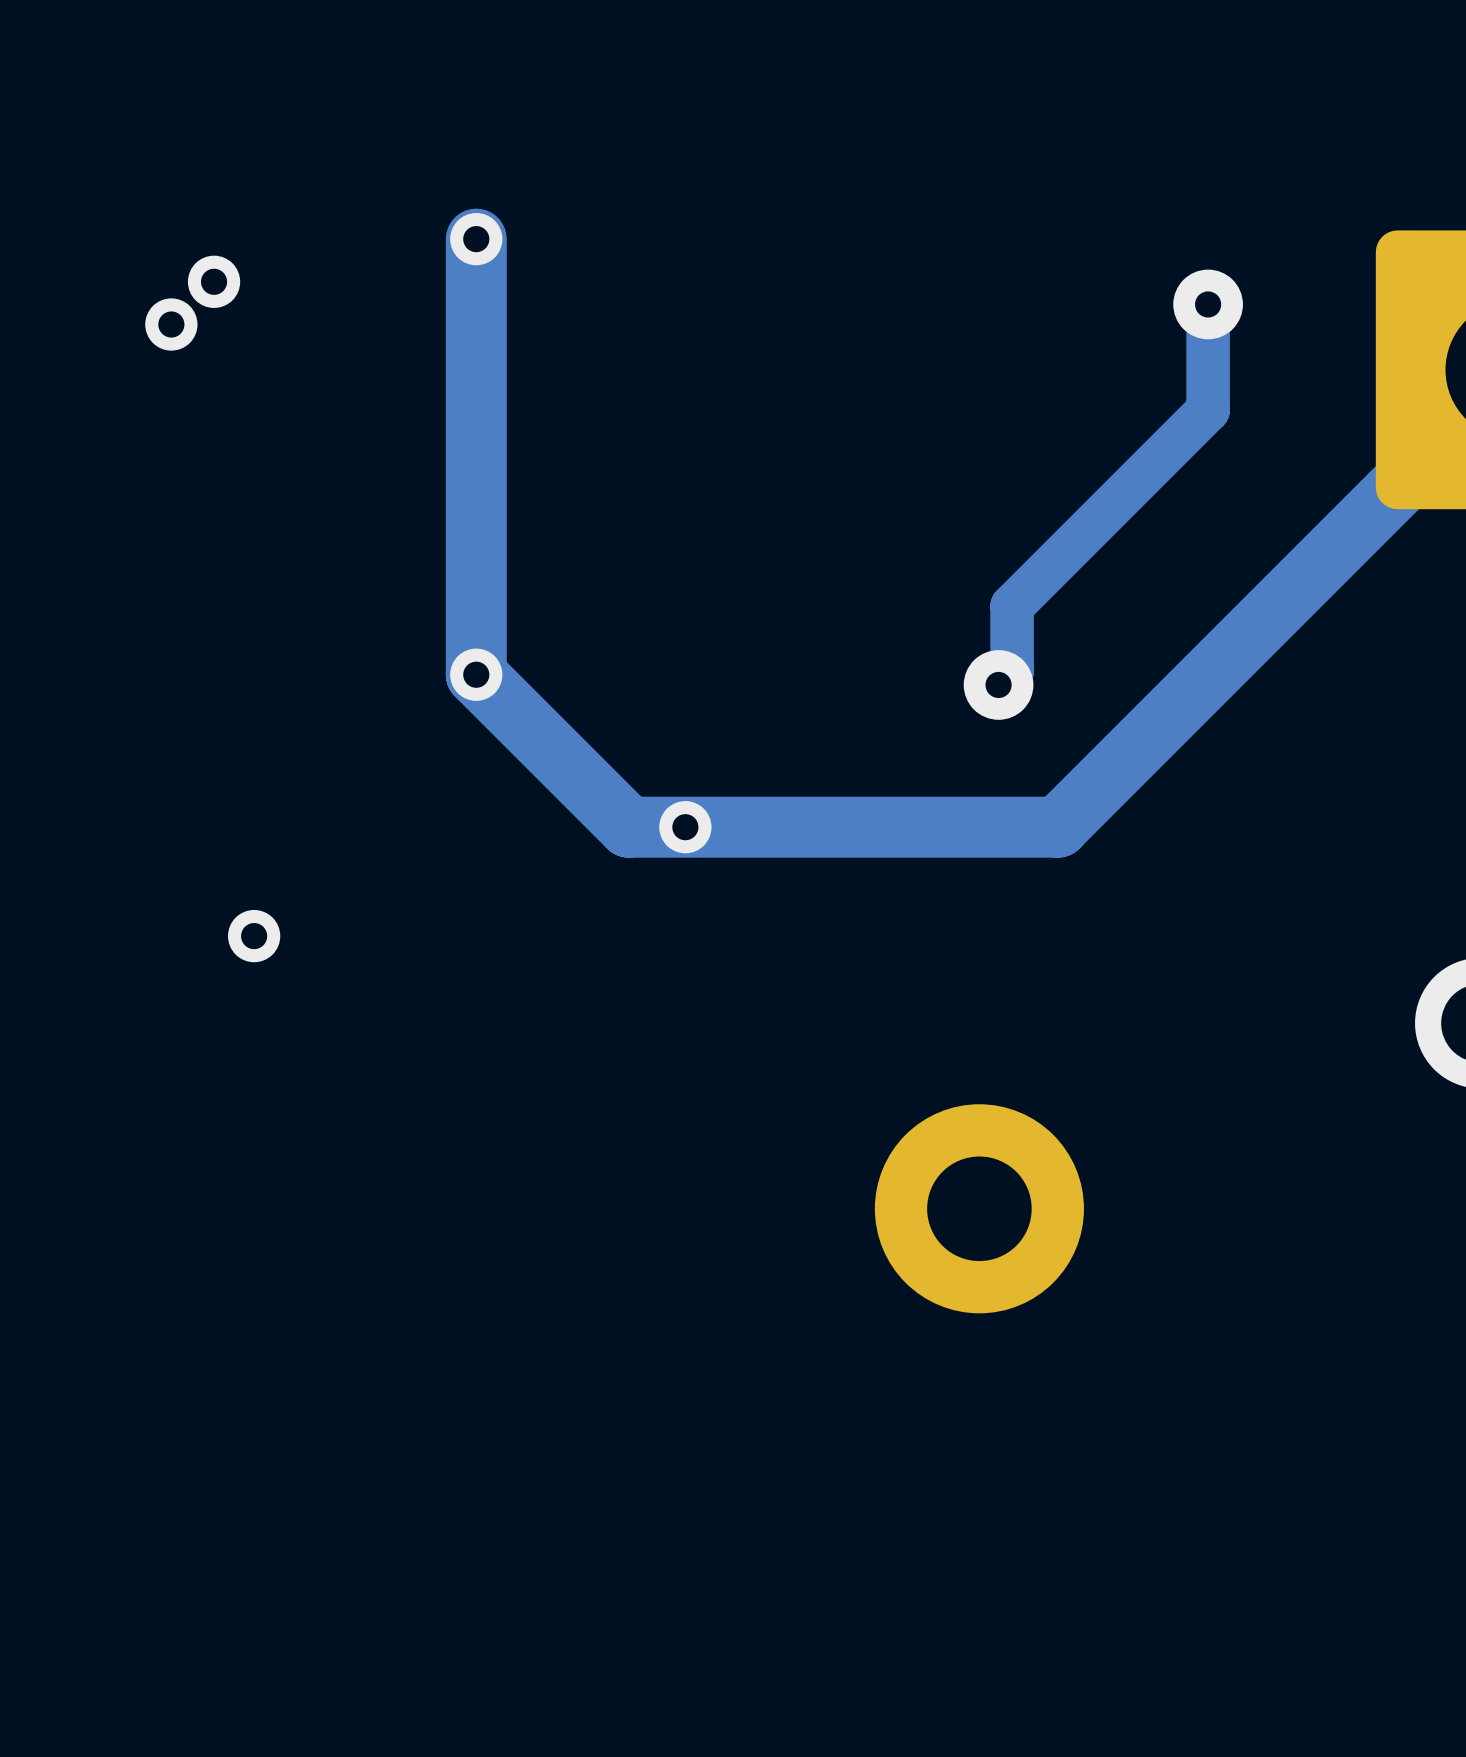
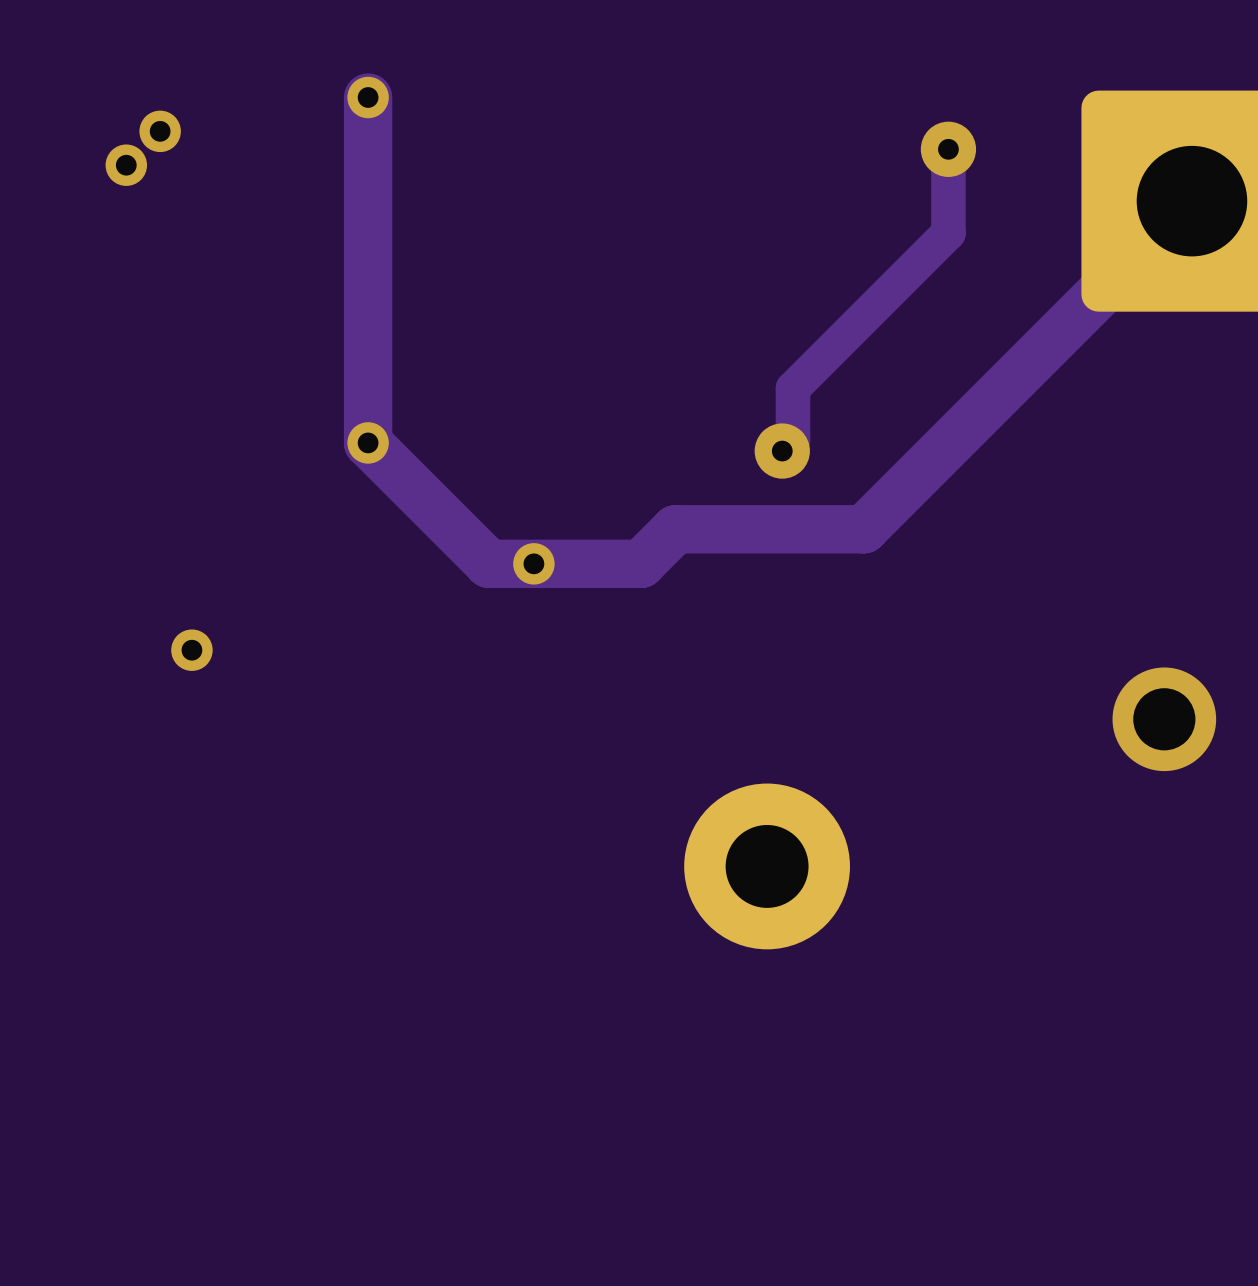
track: (1101, 783) (1057, 827) (820, 827) -> (863, 529) (675, 529) (641, 563)

